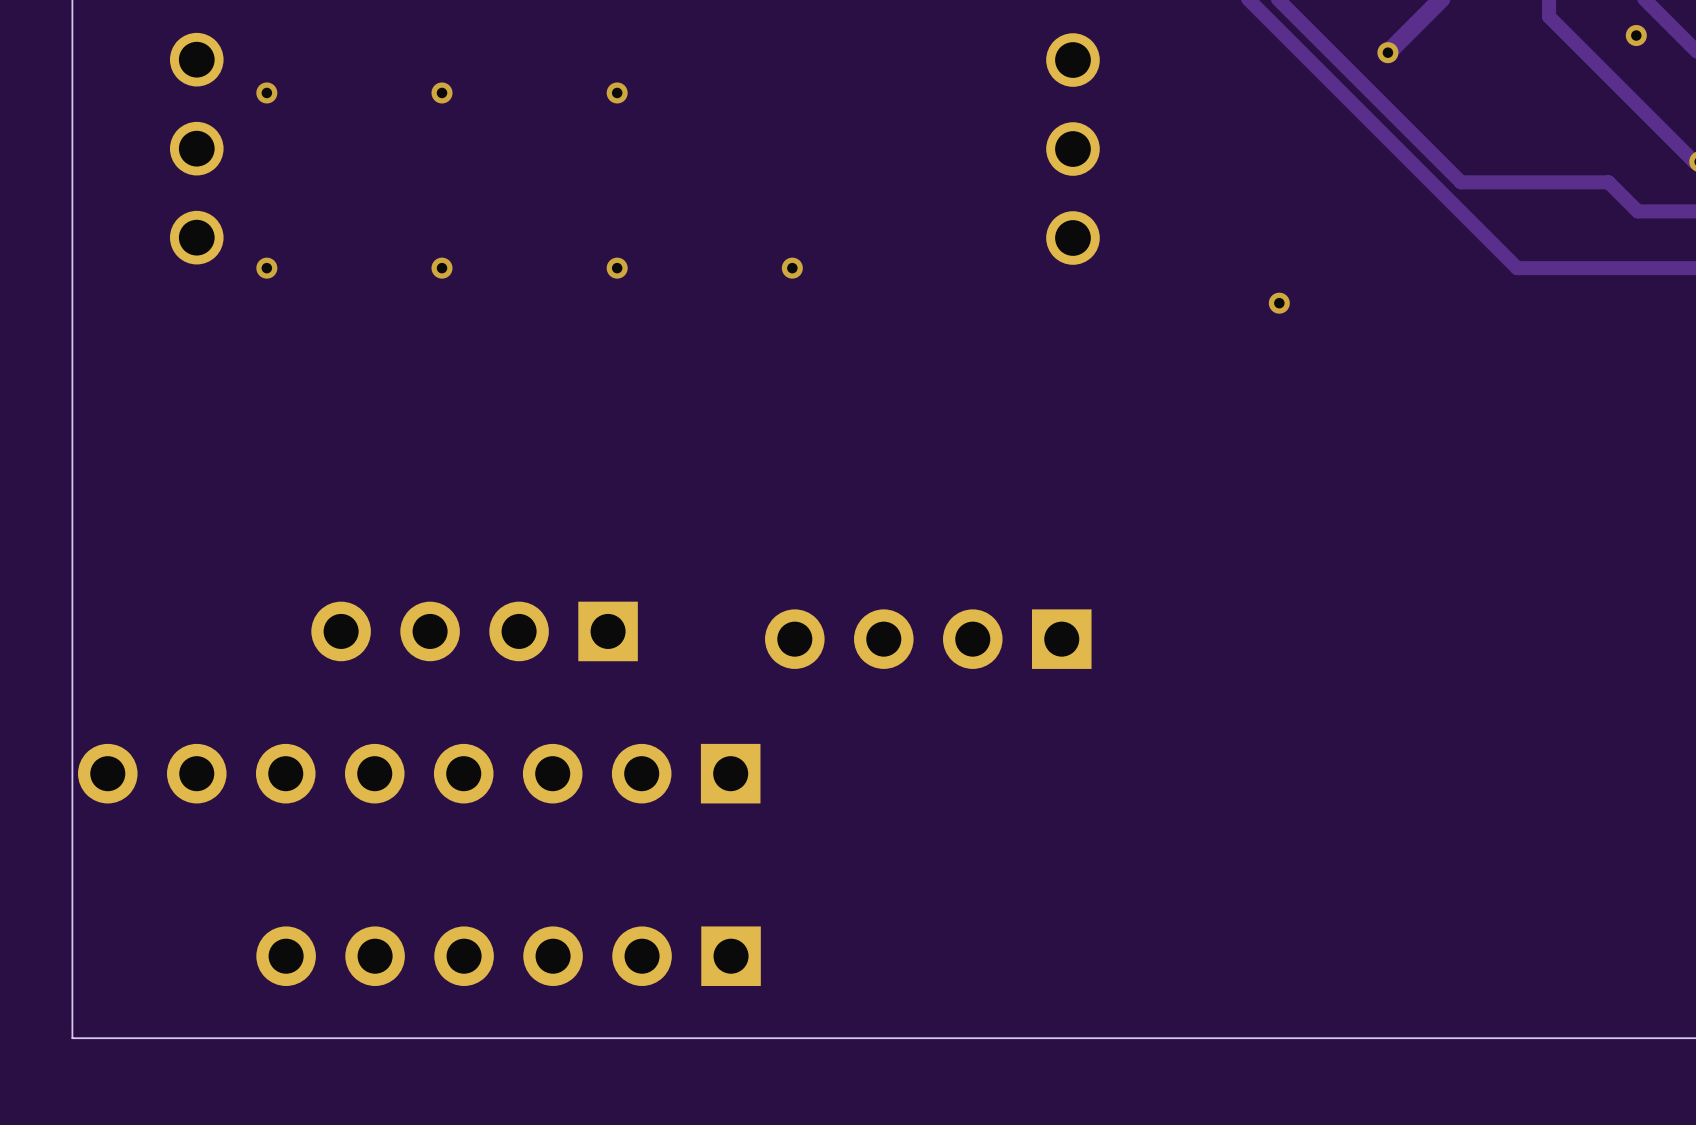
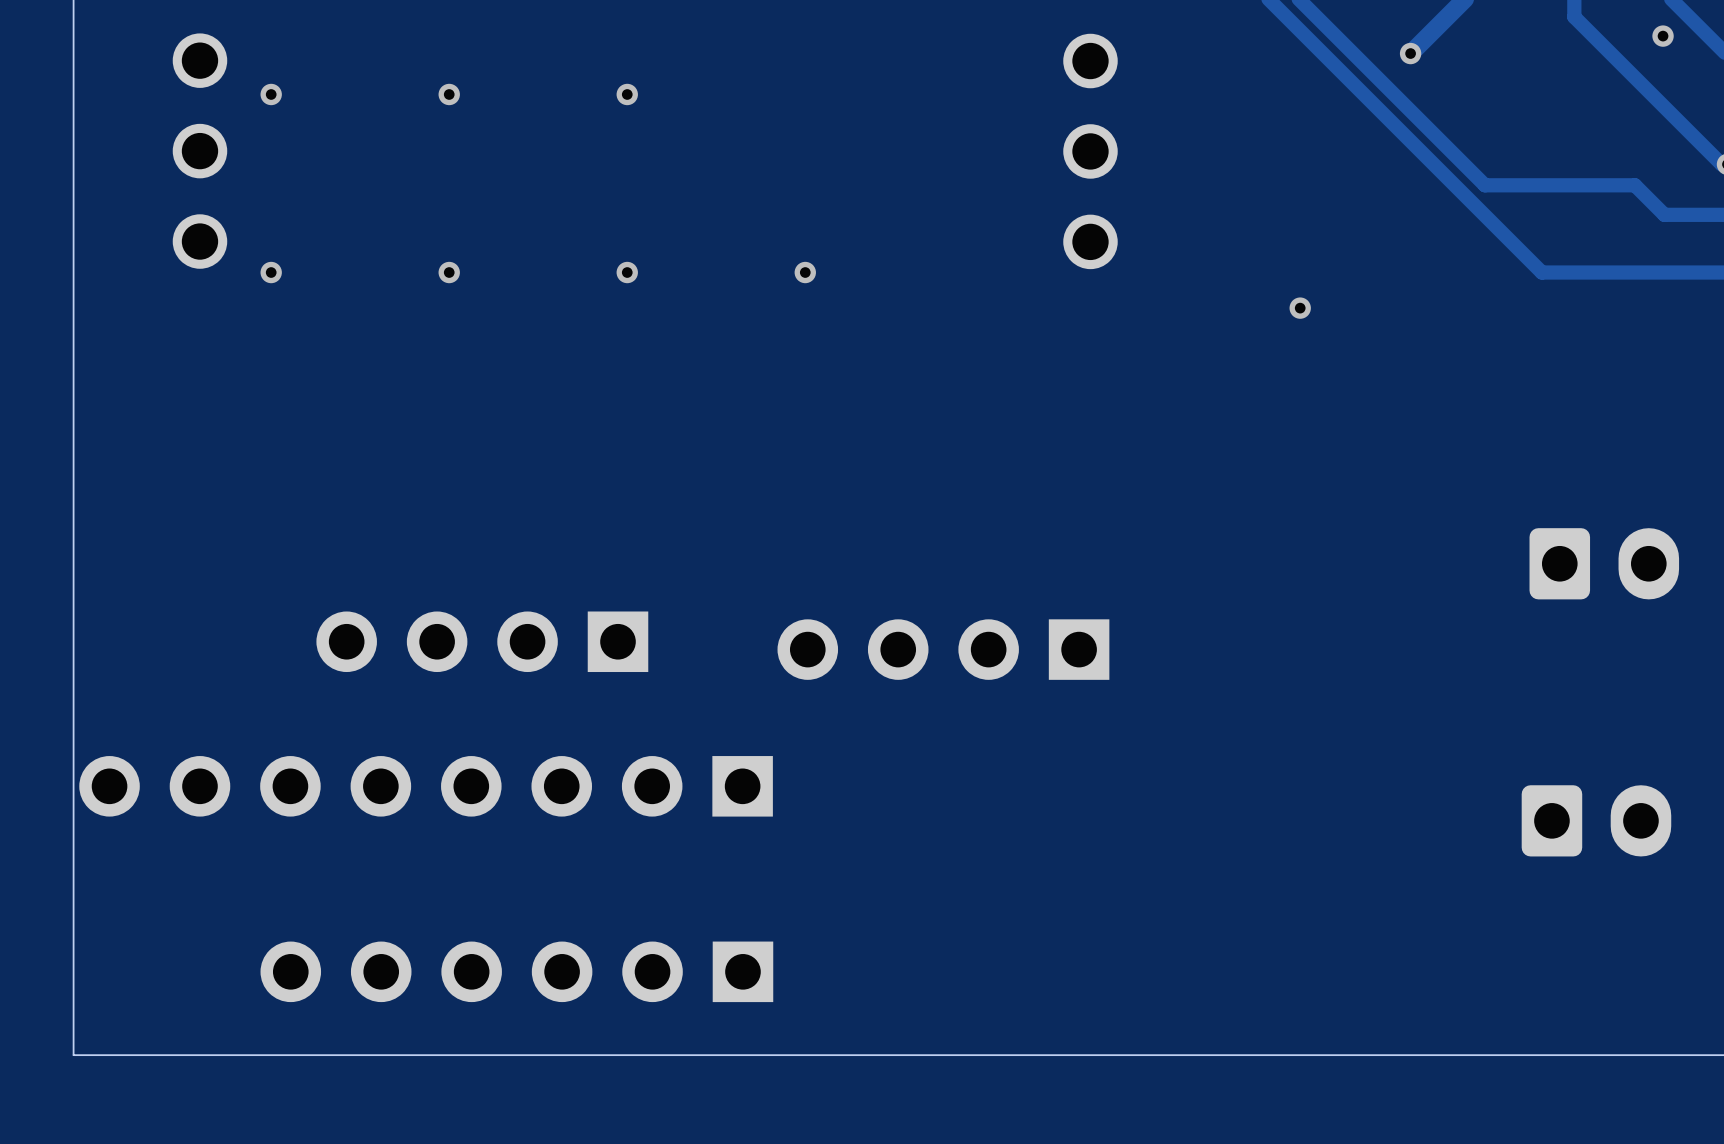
part: none -> (1604, 563)
part: none -> (1596, 820)

